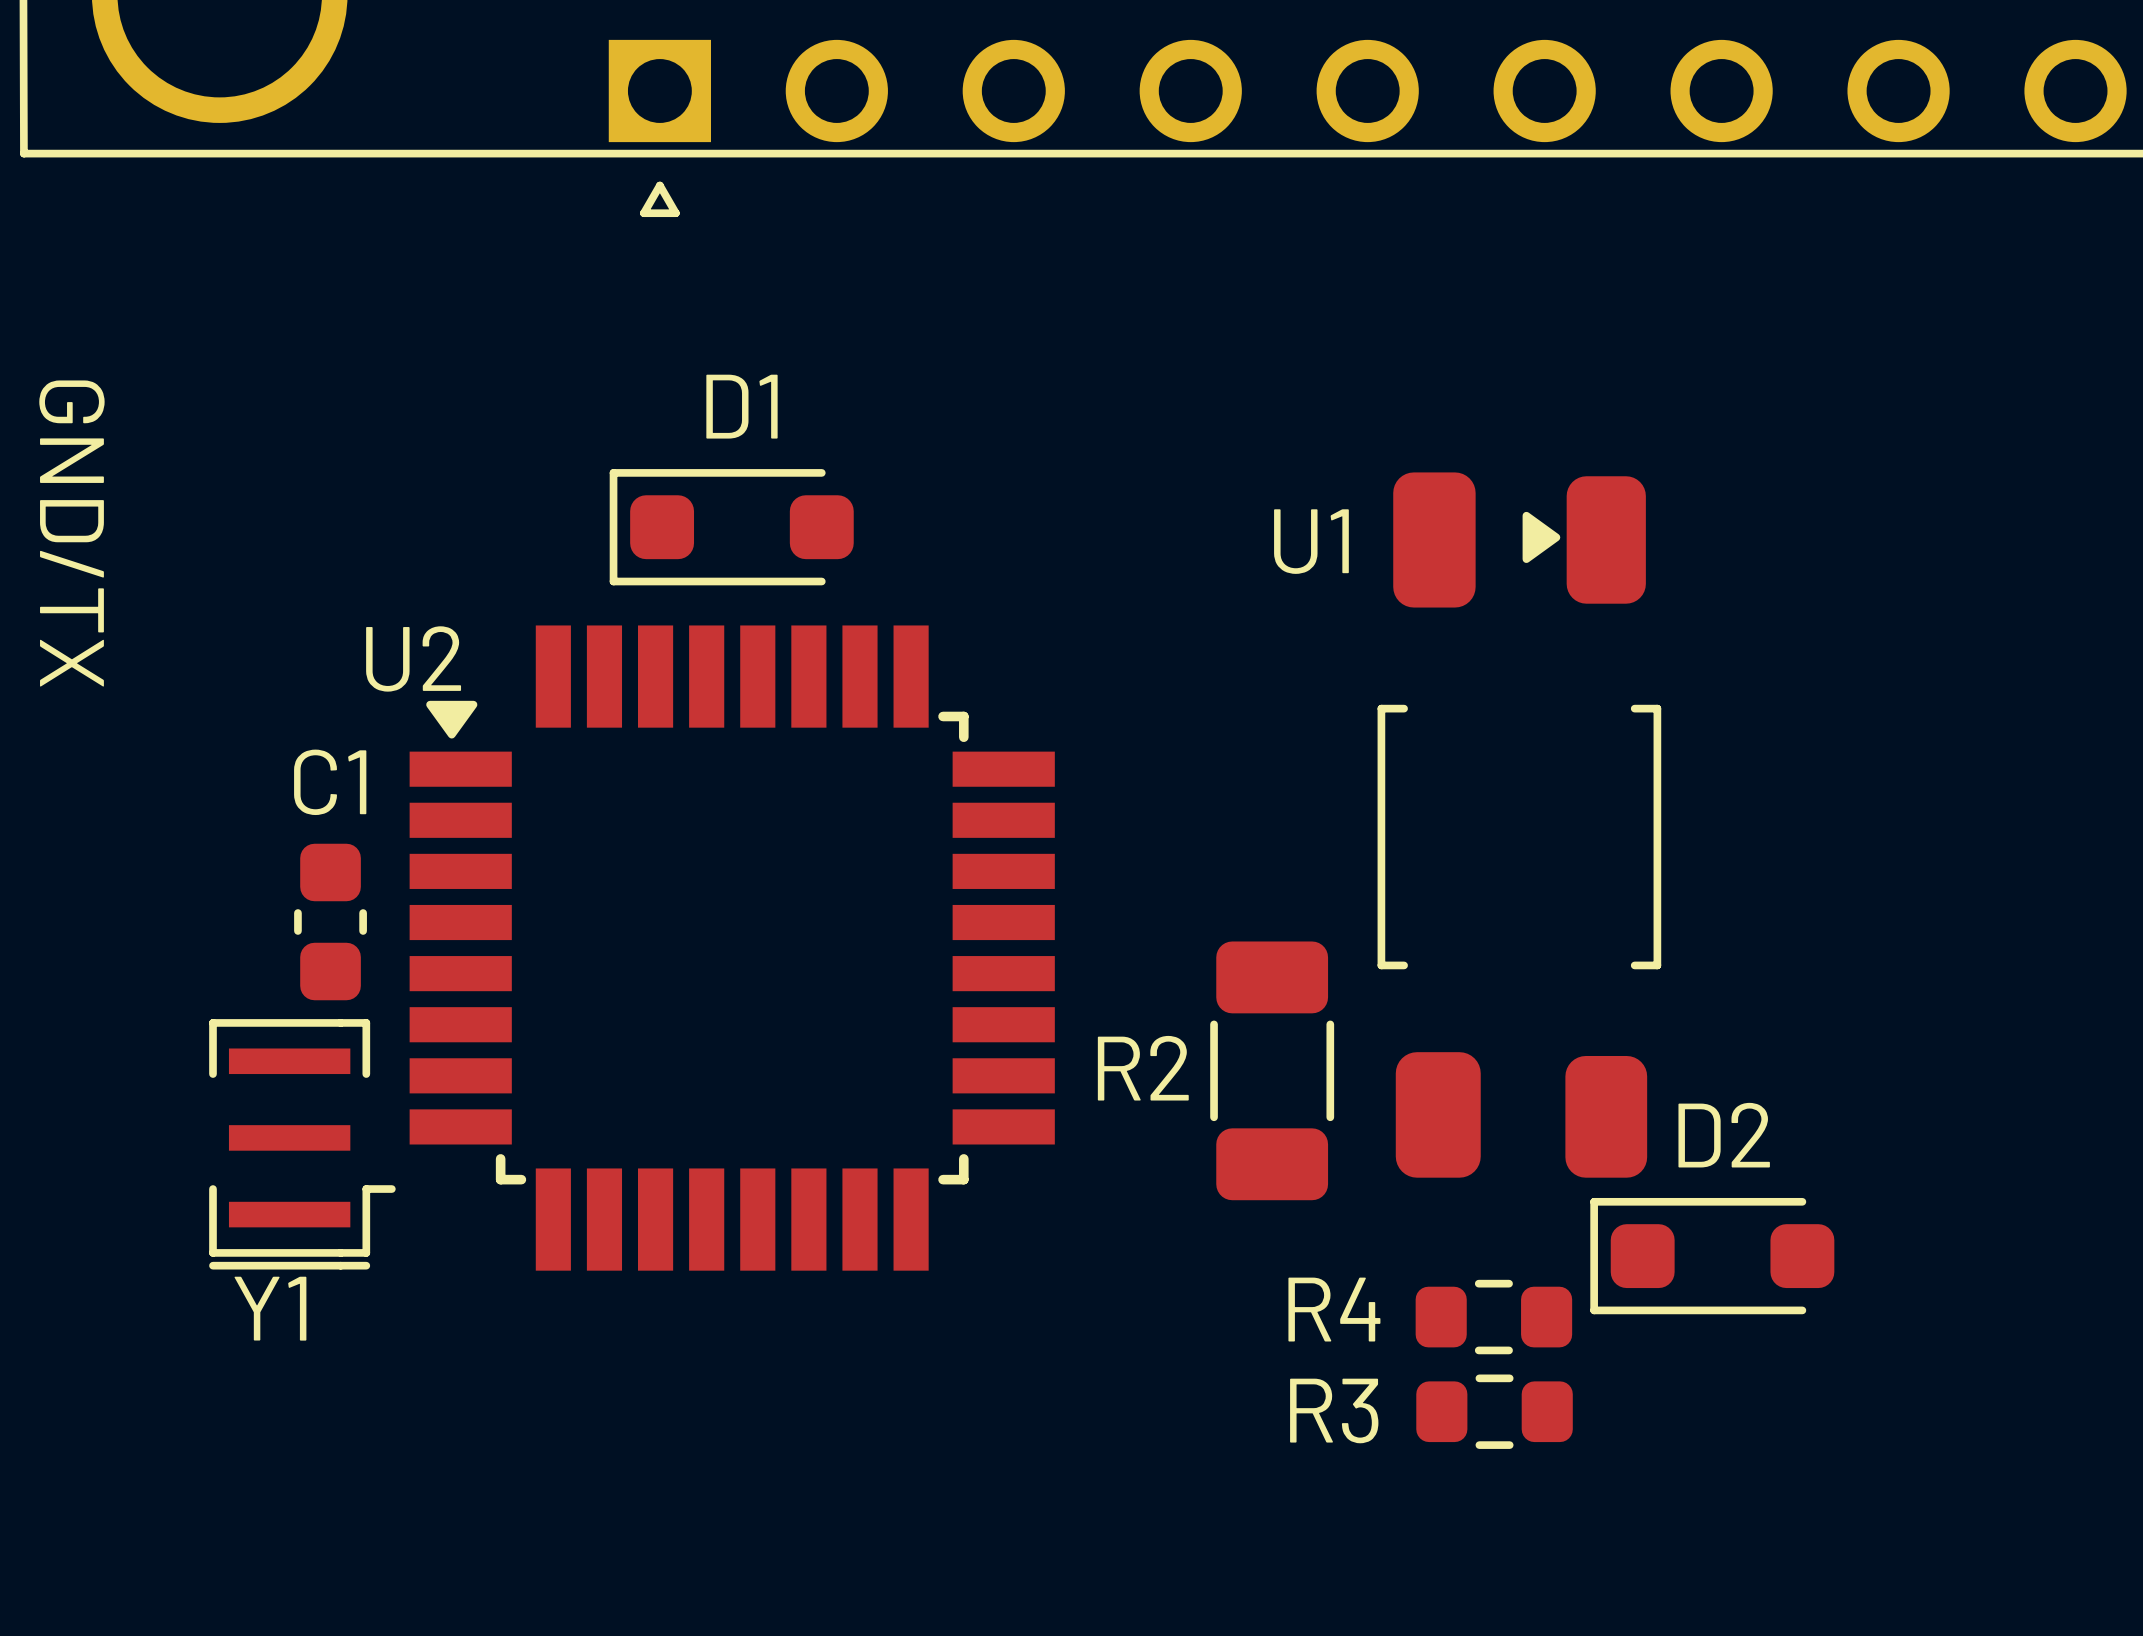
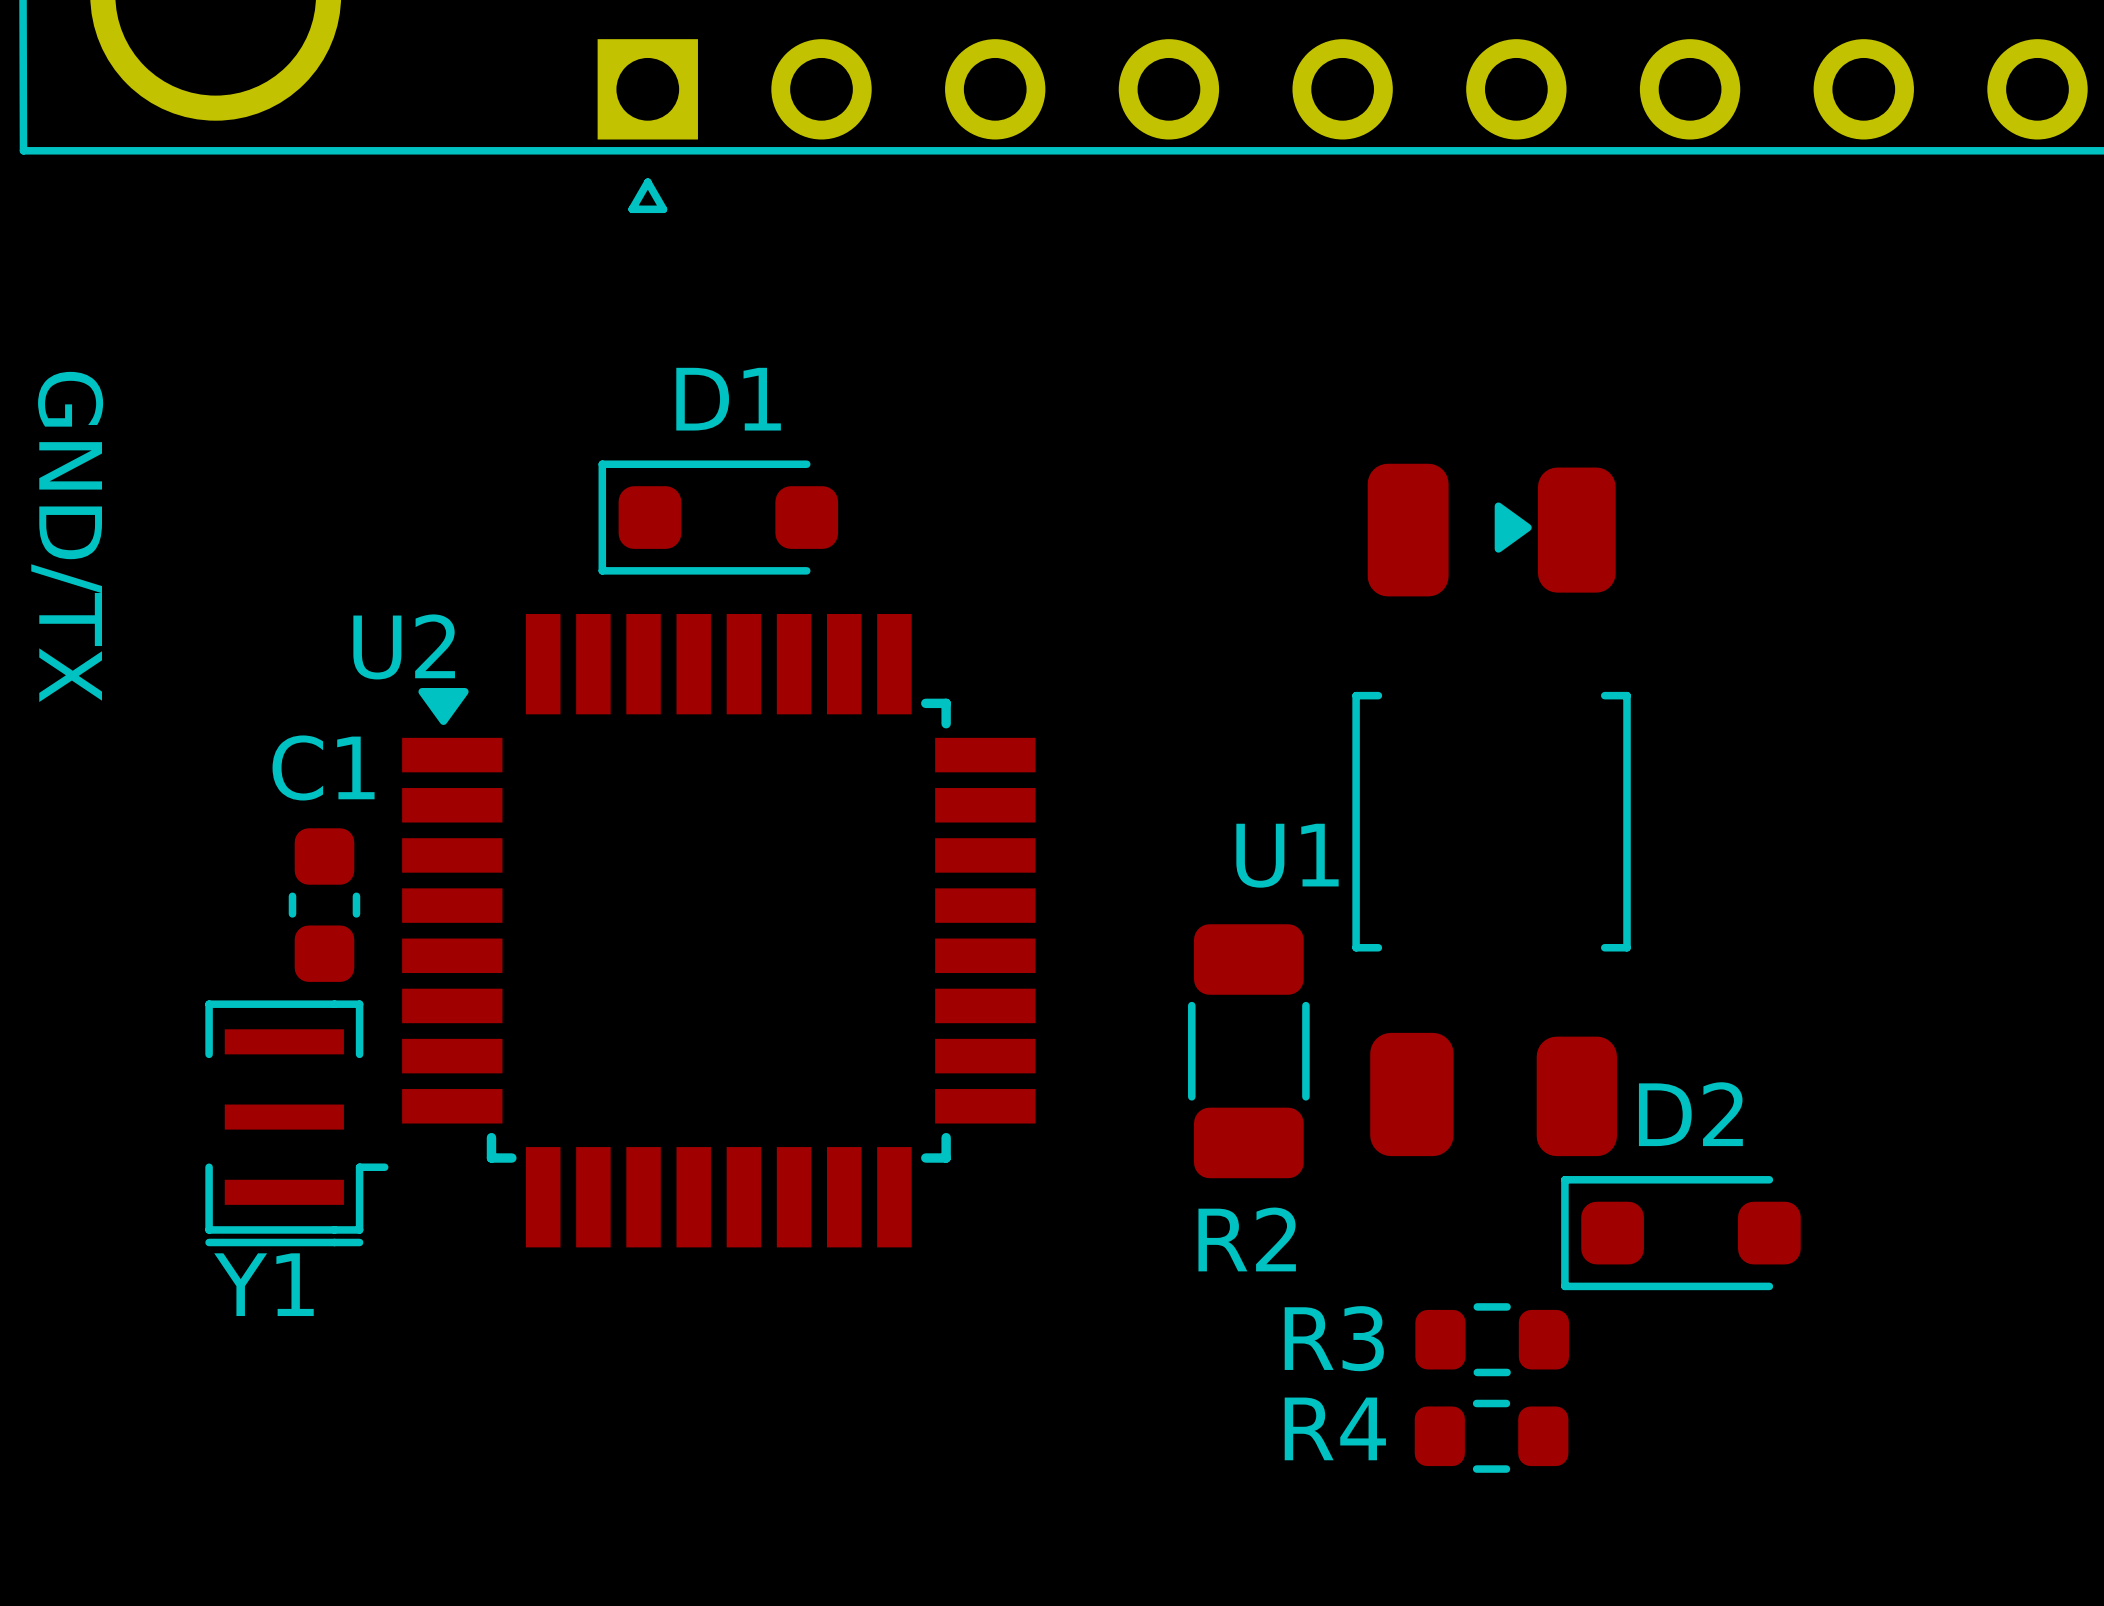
U1 name position: U1 (1311, 541) -> U1 (1287, 855)
R2 name position: R2 (1143, 1068) -> R2 (1247, 1239)
R4 position: (1493, 1317) -> (1491, 1436)
R3 position: (1494, 1411) -> (1492, 1339)

